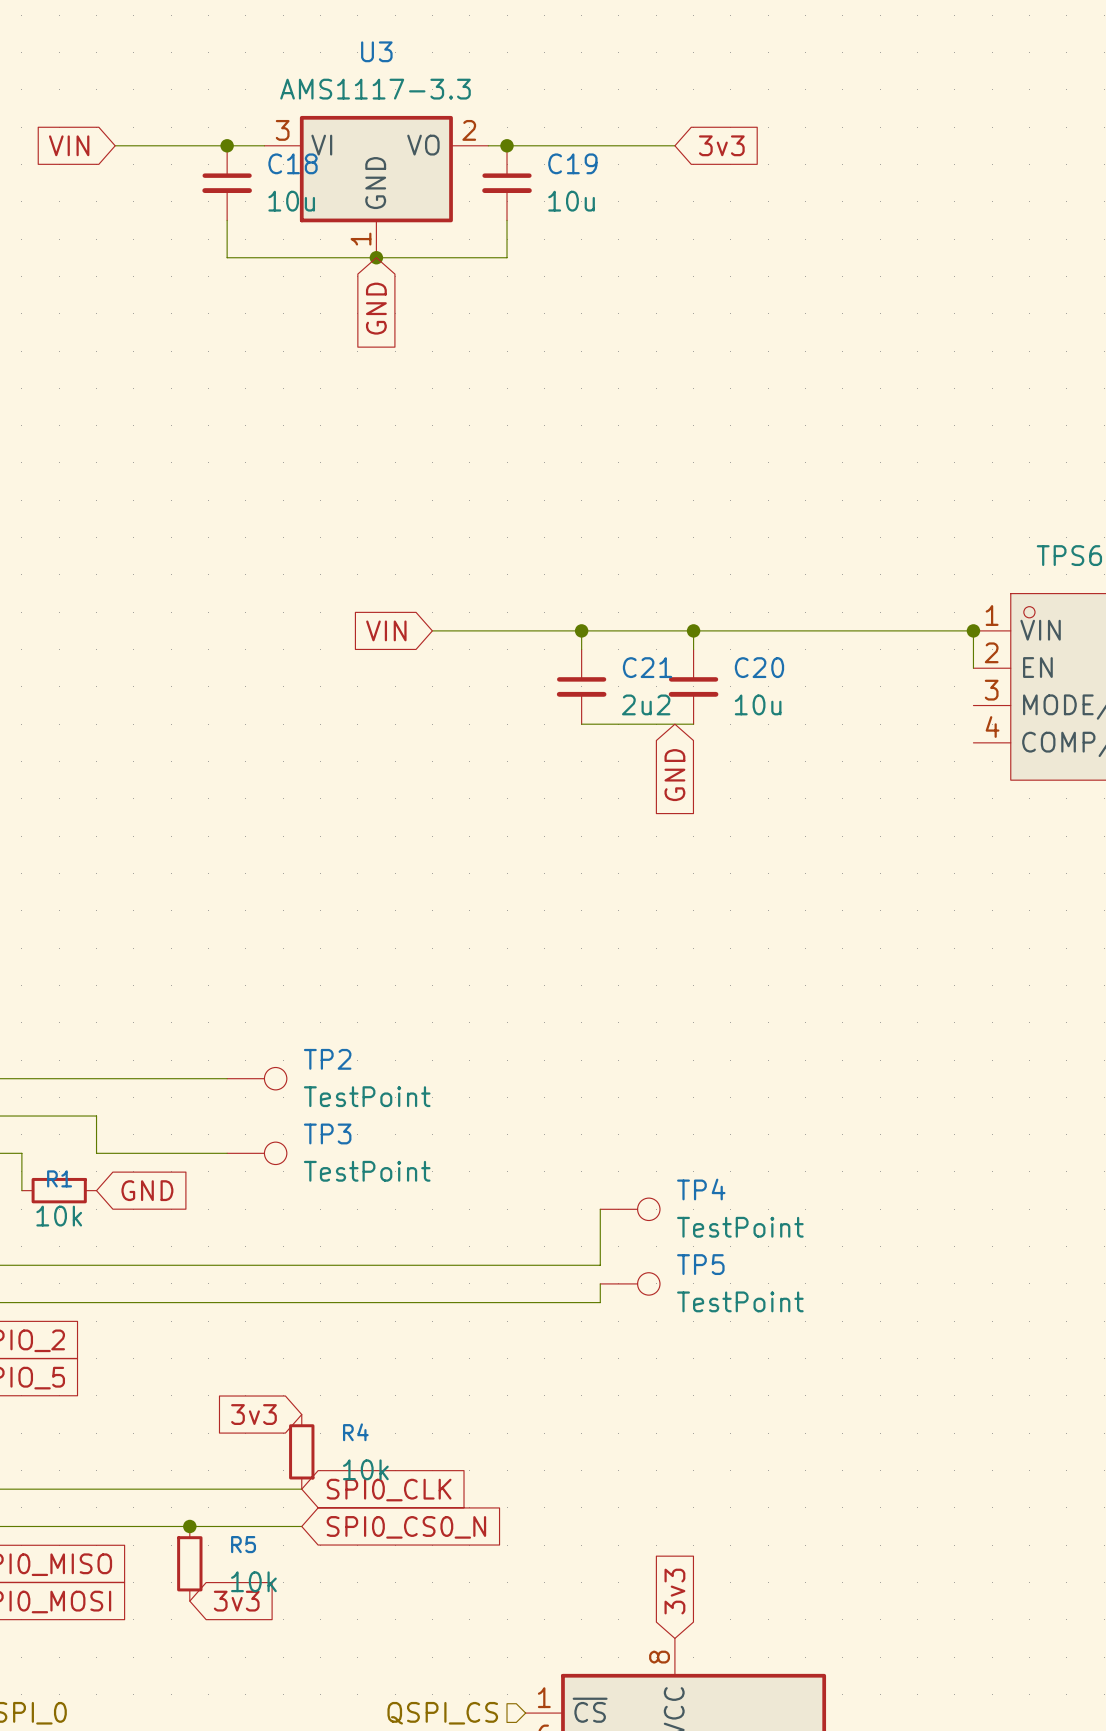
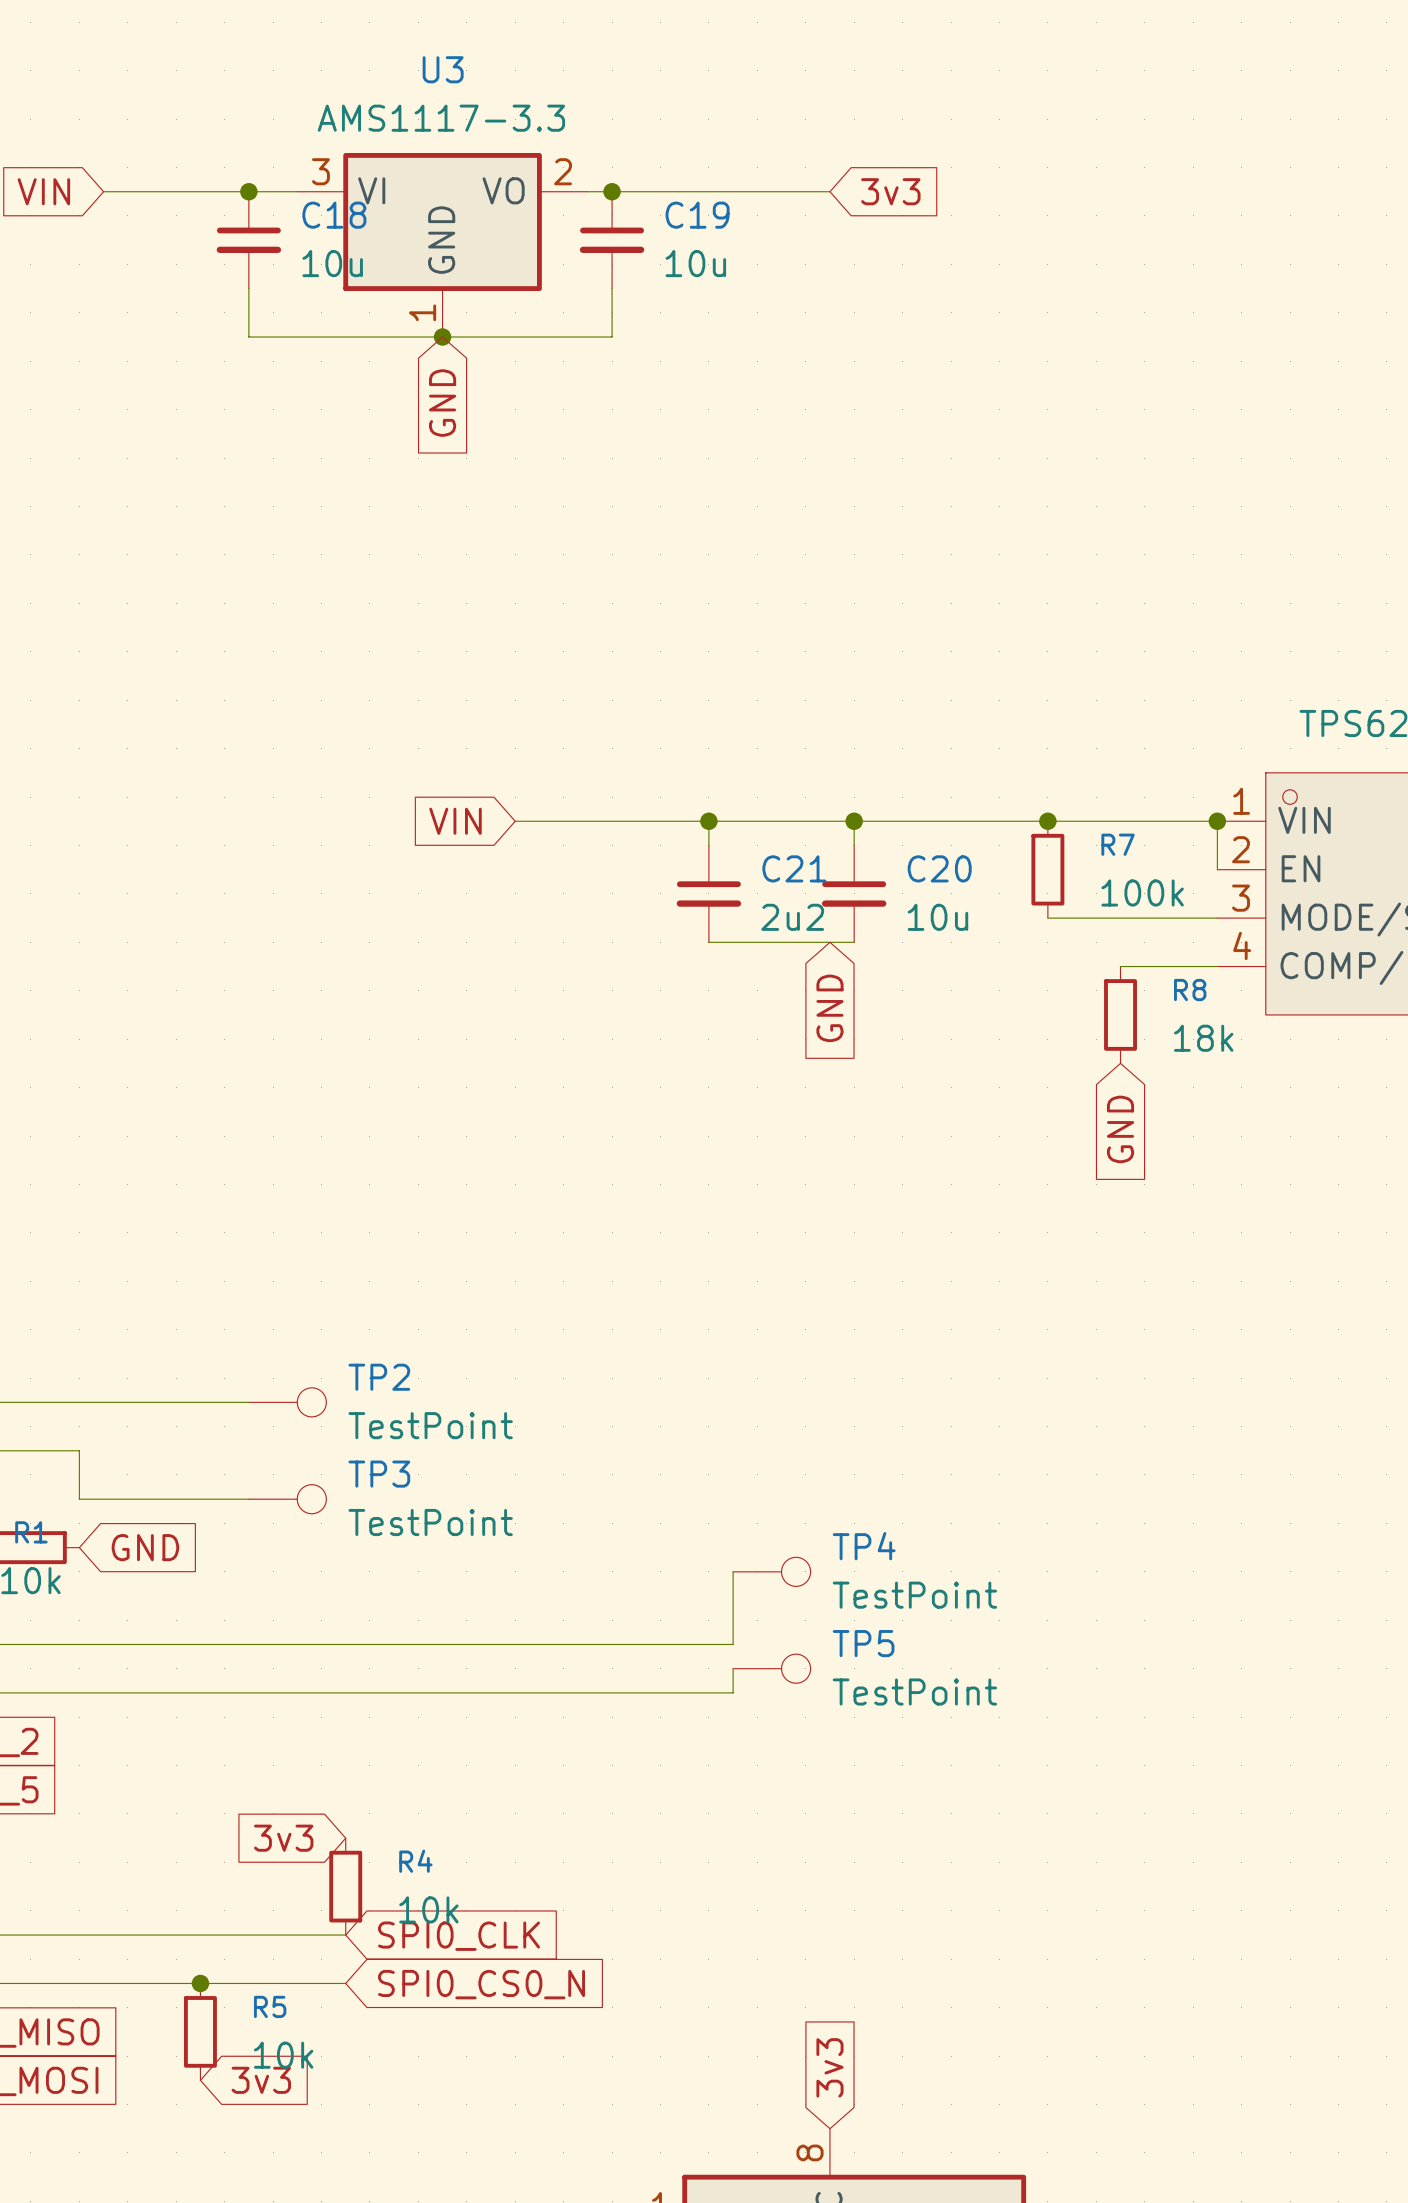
junction: none -> (1047, 821)
R7: none -> 100k (1047, 869)
wire: none -> (1047, 918) (1217, 918)
wire: none -> (1120, 966) (1217, 966)
R8: none -> 18k (1120, 1014)
global label: none -> GND (1120, 1129)

